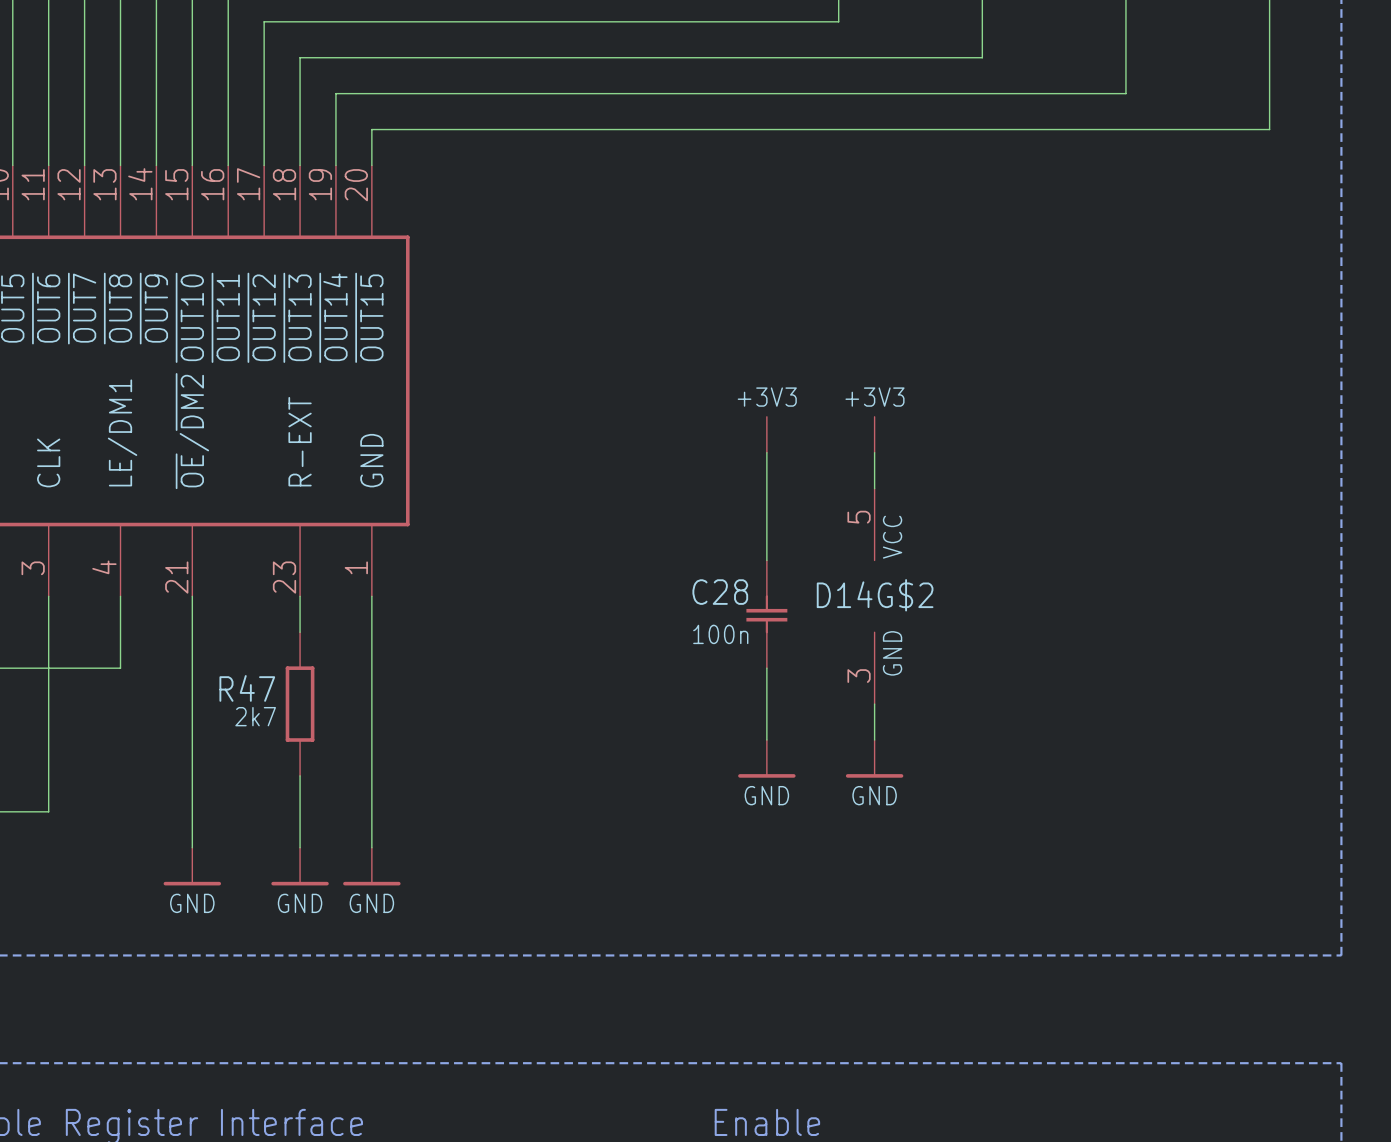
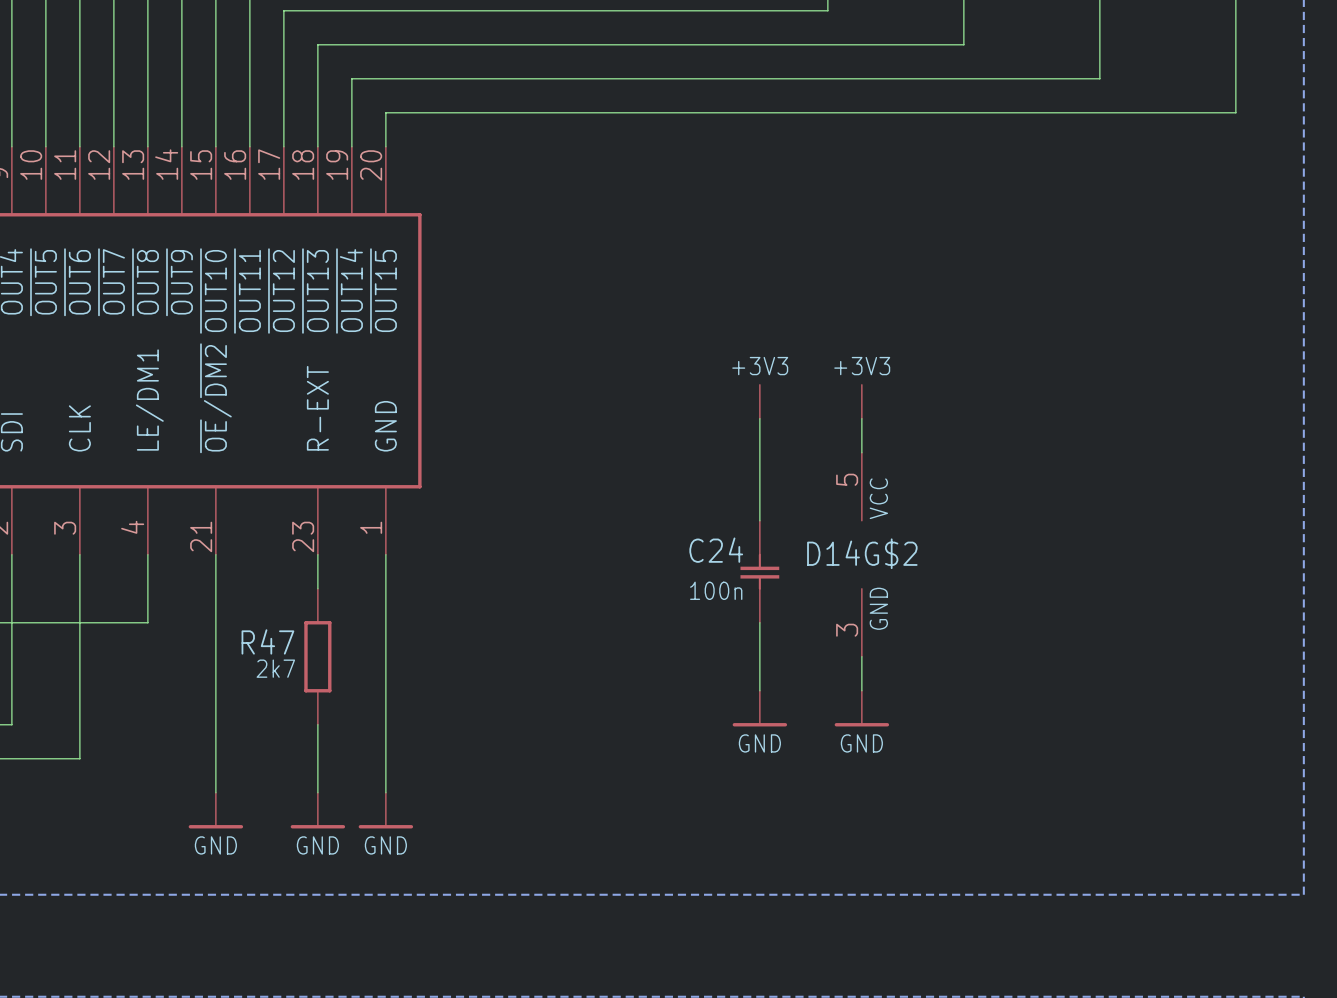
C28 name: C28 (720, 592) -> C24 (716, 550)

